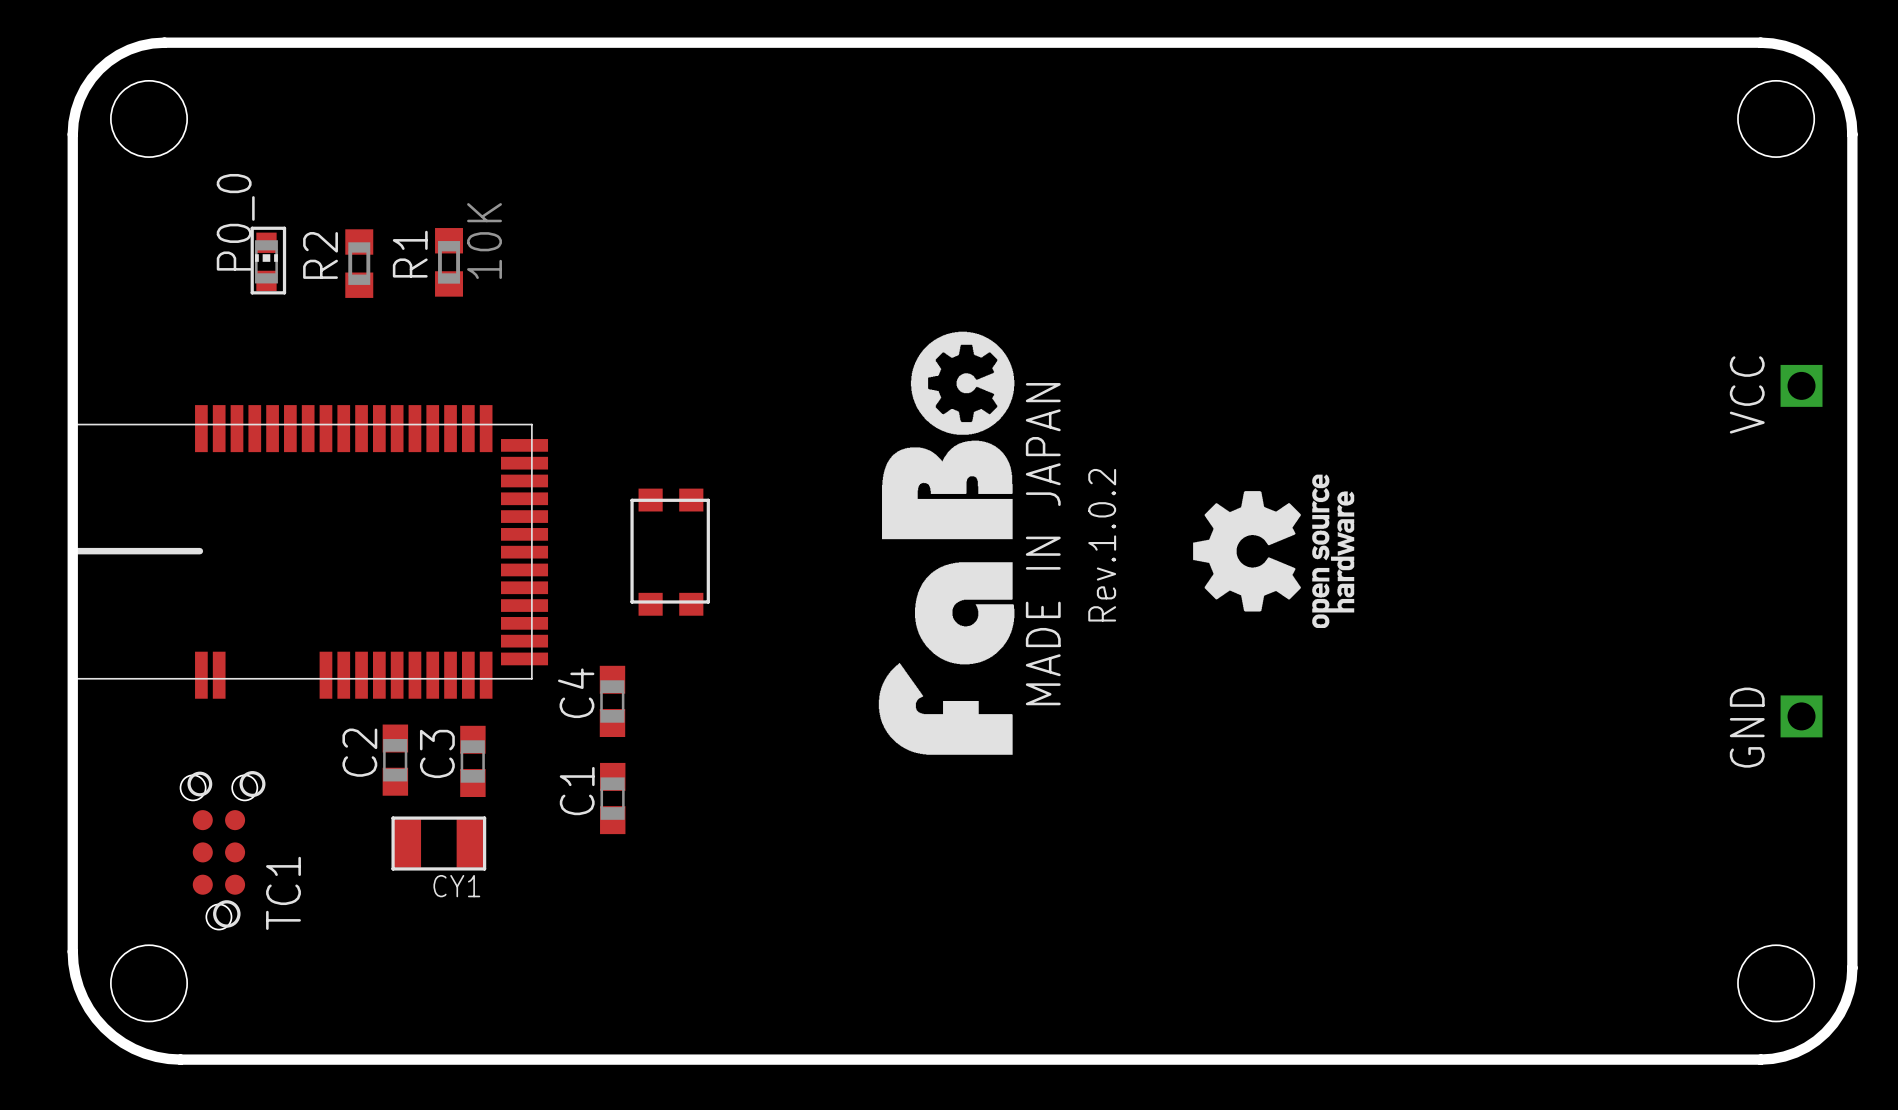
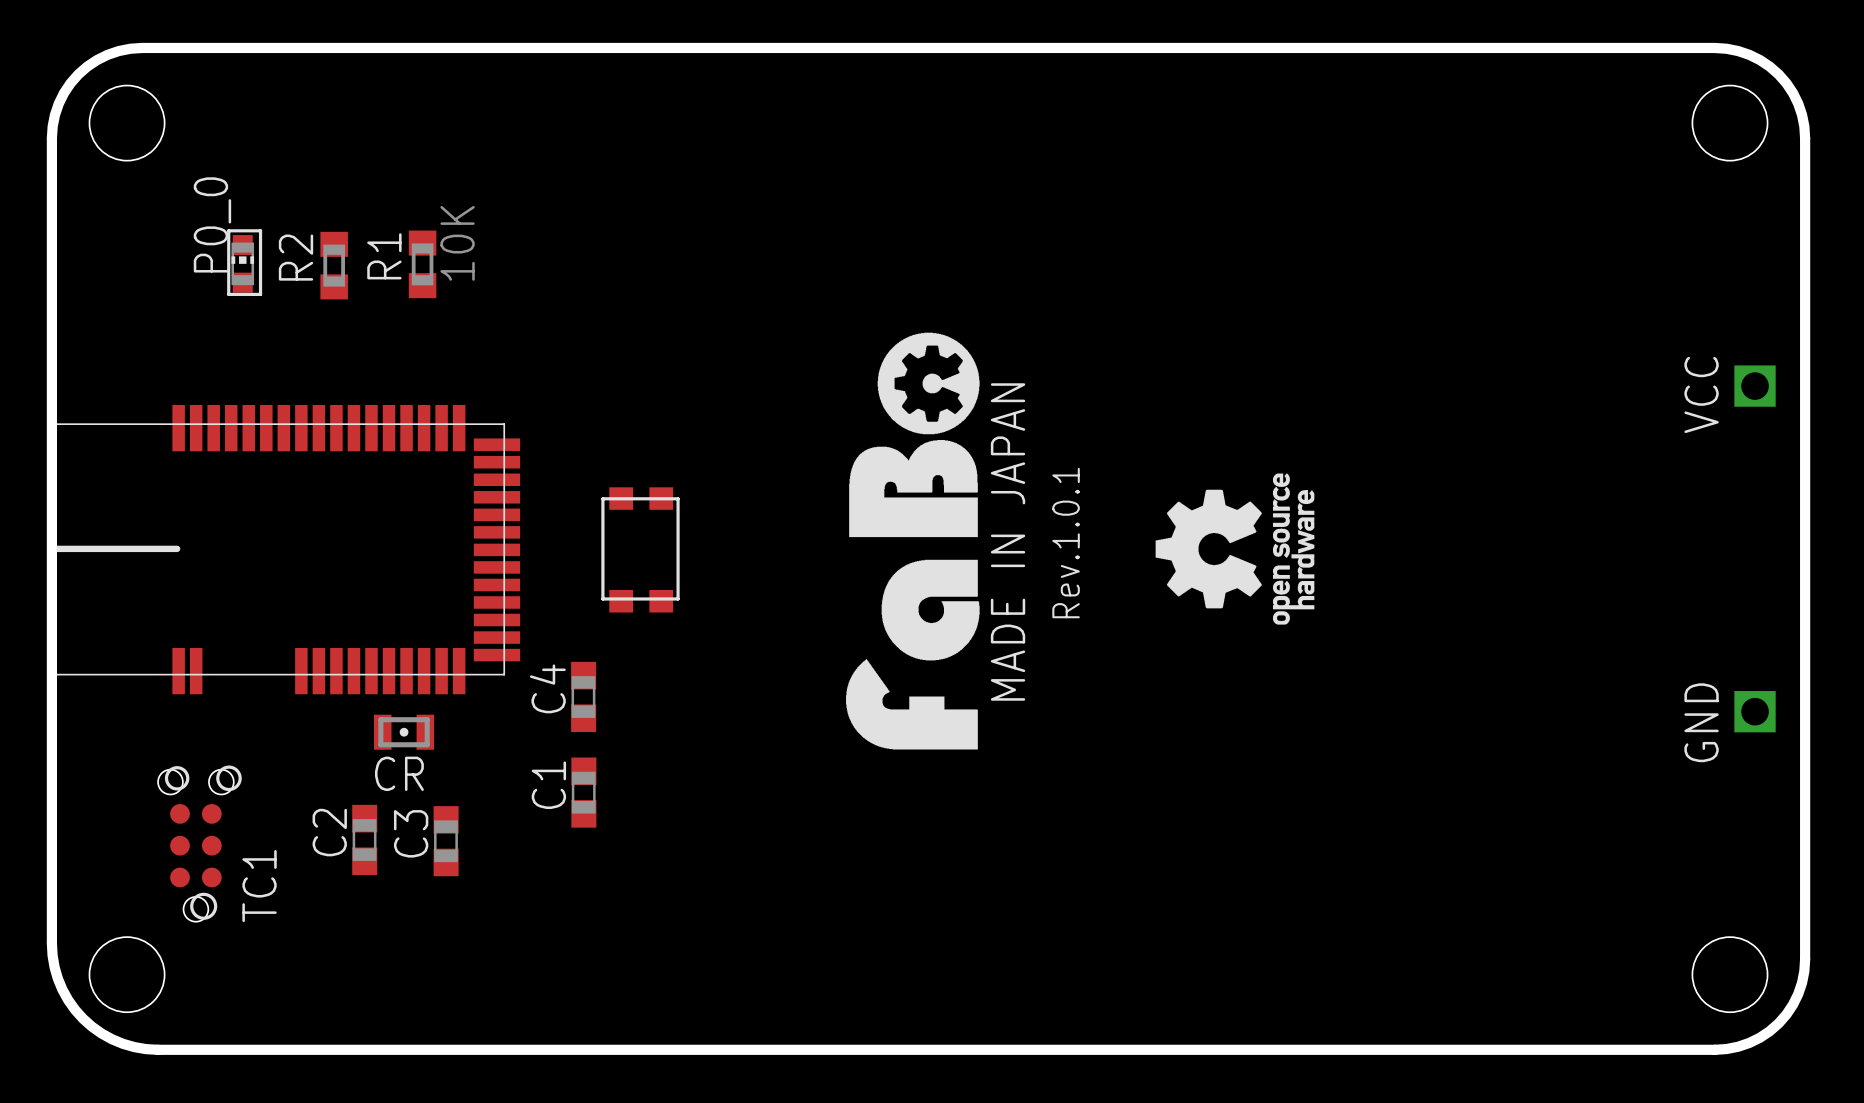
text: Rev.1.0.2 (1102, 545) -> Rev.1.0.1 (1066, 543)
CR: none -> (404, 732)
C2 position: (395, 760) -> (364, 839)
C3 position: (472, 761) -> (446, 841)
CY1: (438, 843) -> none

